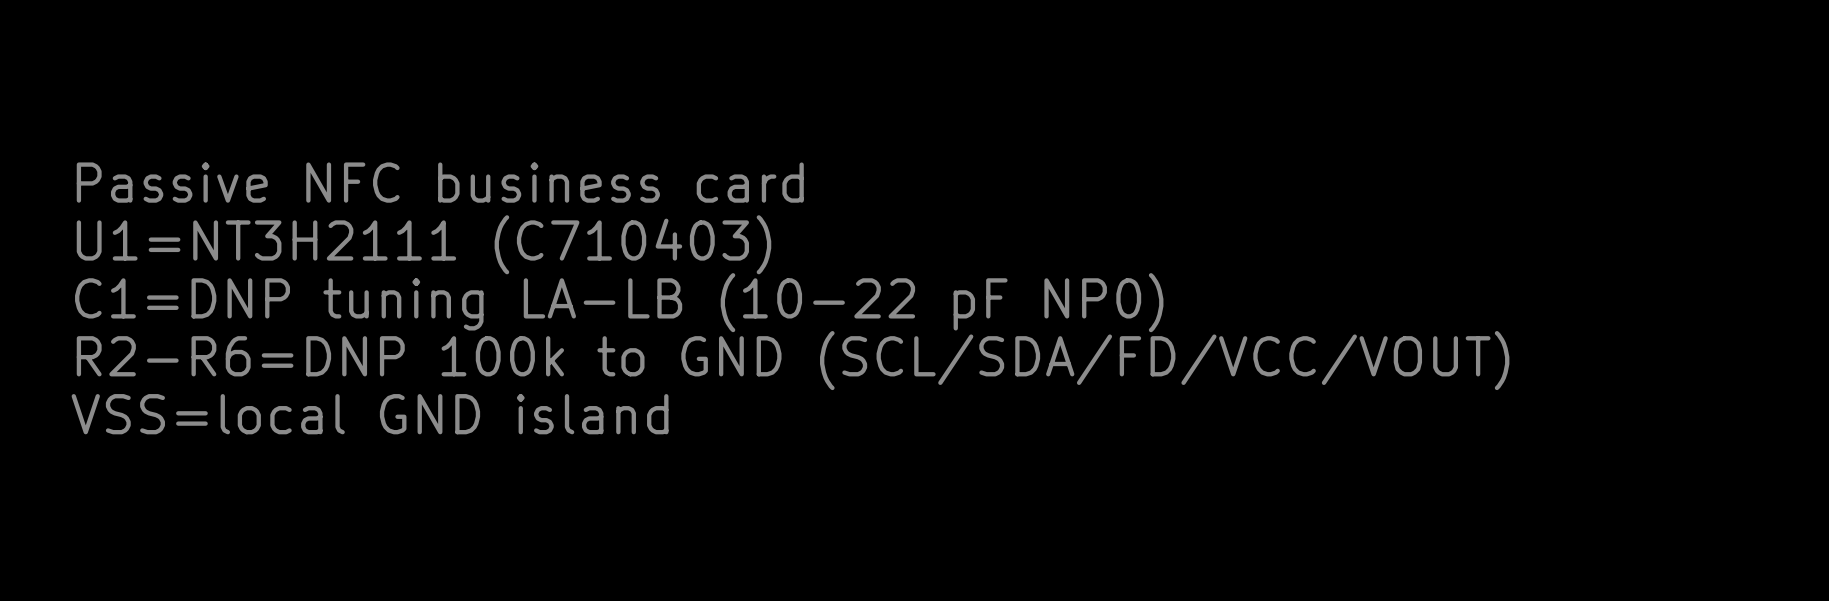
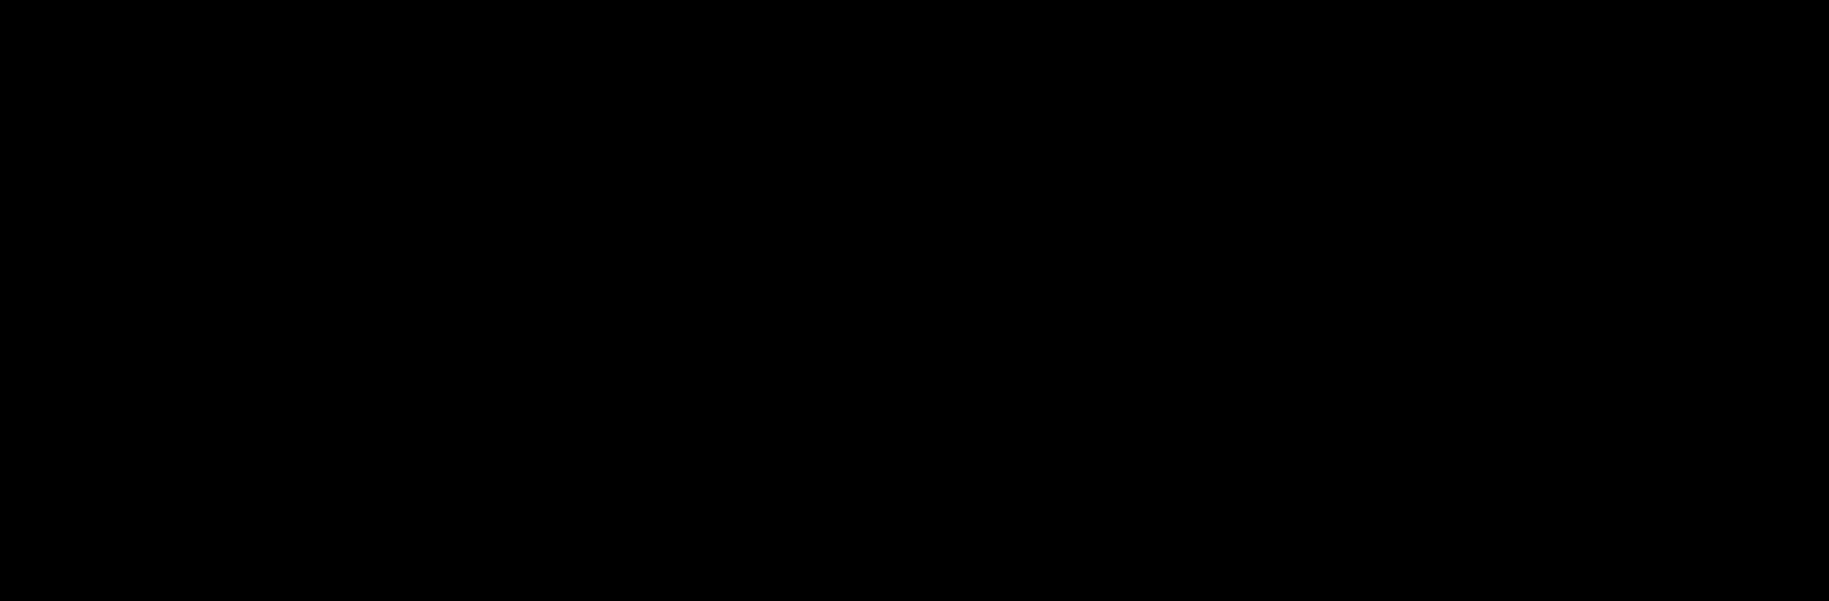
text: Passive NFC business card (440, 182) -> none
text: U1=NT3H2111 (C710403) (424, 244) -> none
text: C1=DNP tuning LA-LB (10-22 pF NP0) (619, 302) -> none
text: R2-R6=DNP 100k to GND (SCL/SDA/FD/VCC/VOUT) (793, 360) -> none
text: VSS=local GND island (370, 414) -> none

